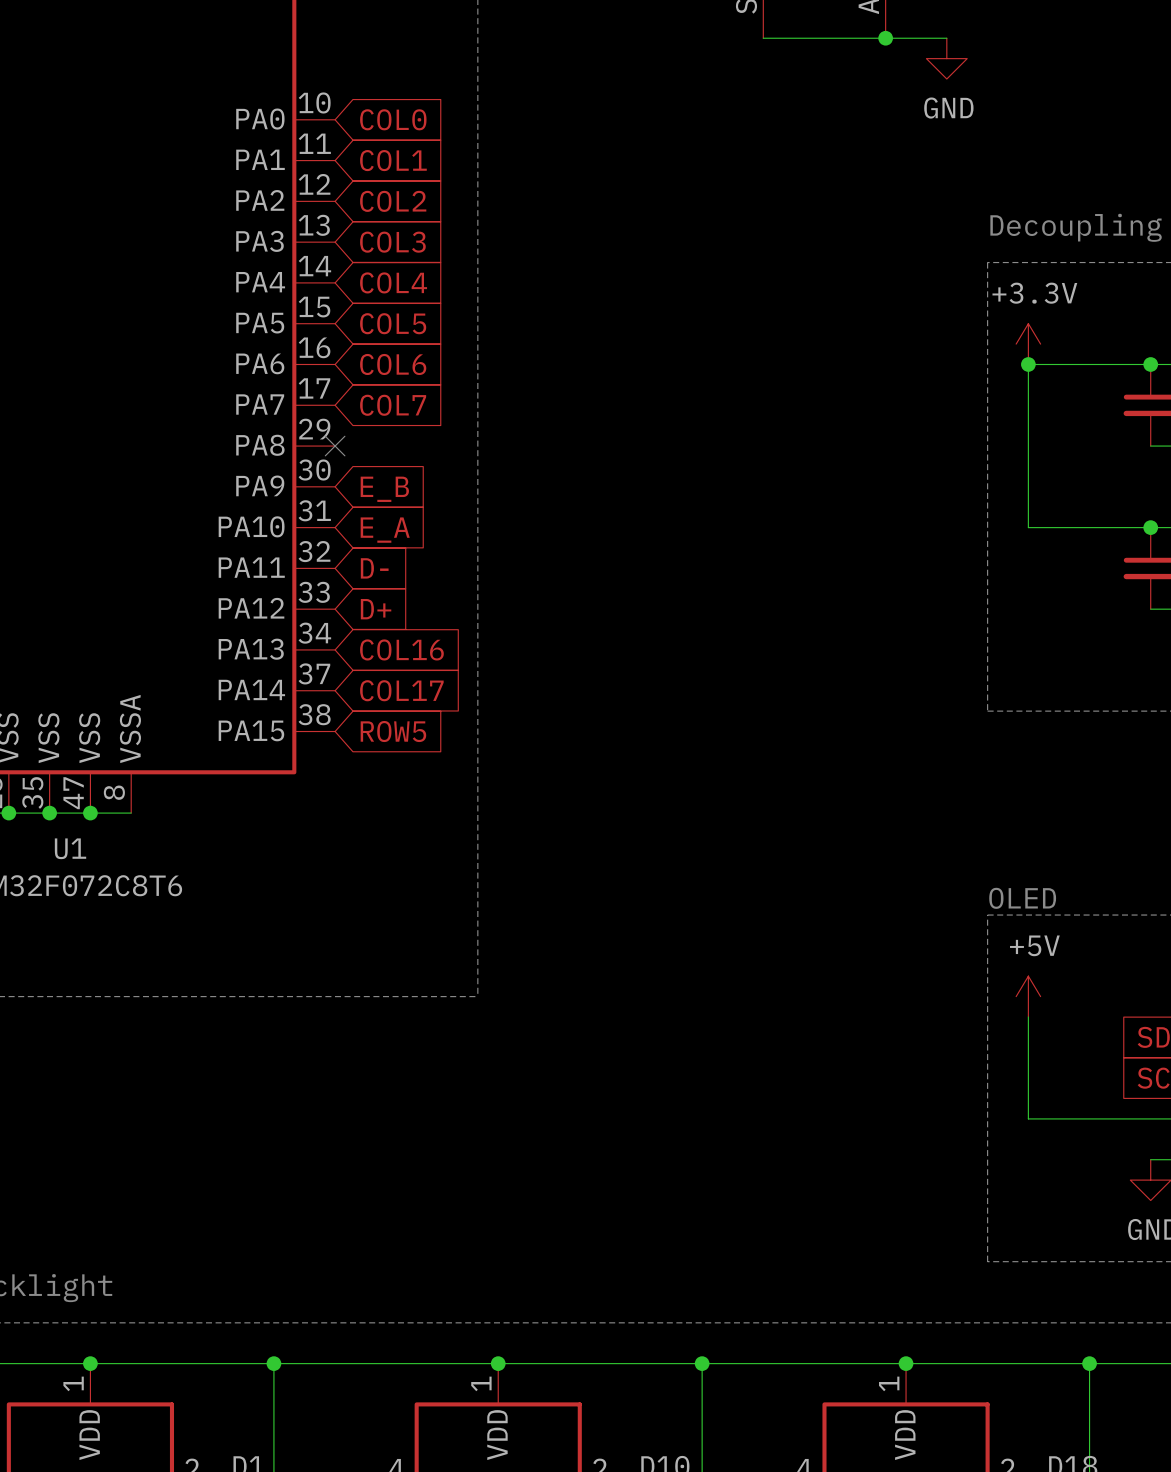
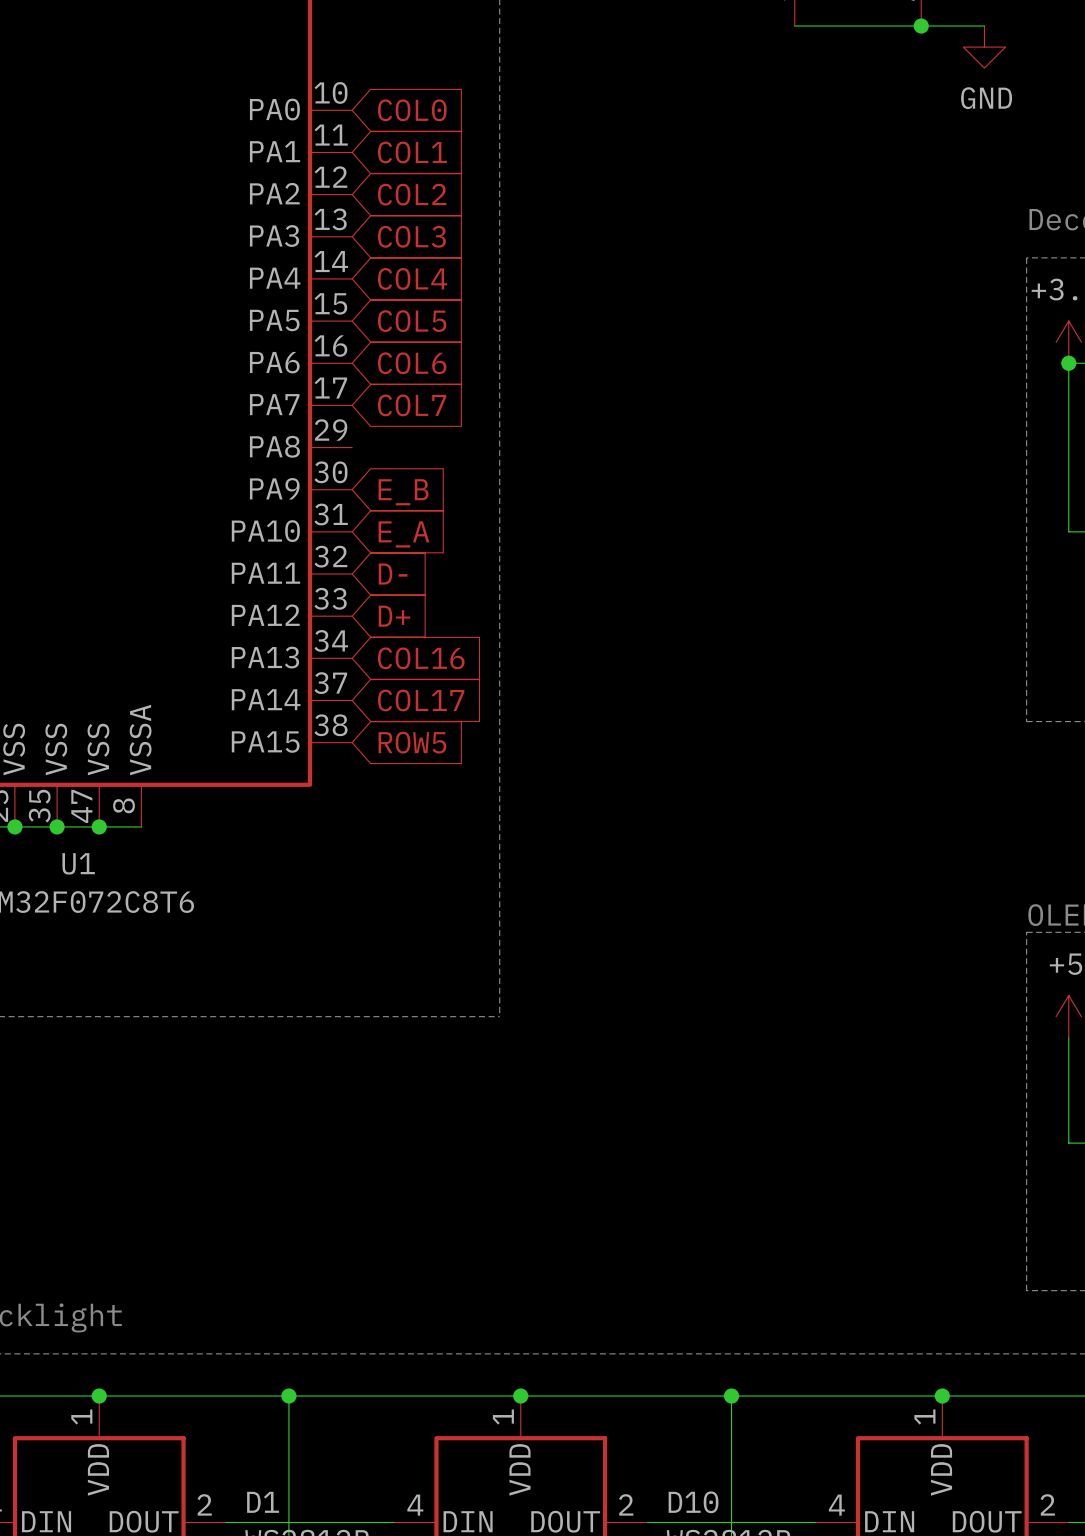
no-connect mark: (335, 446) -> none

